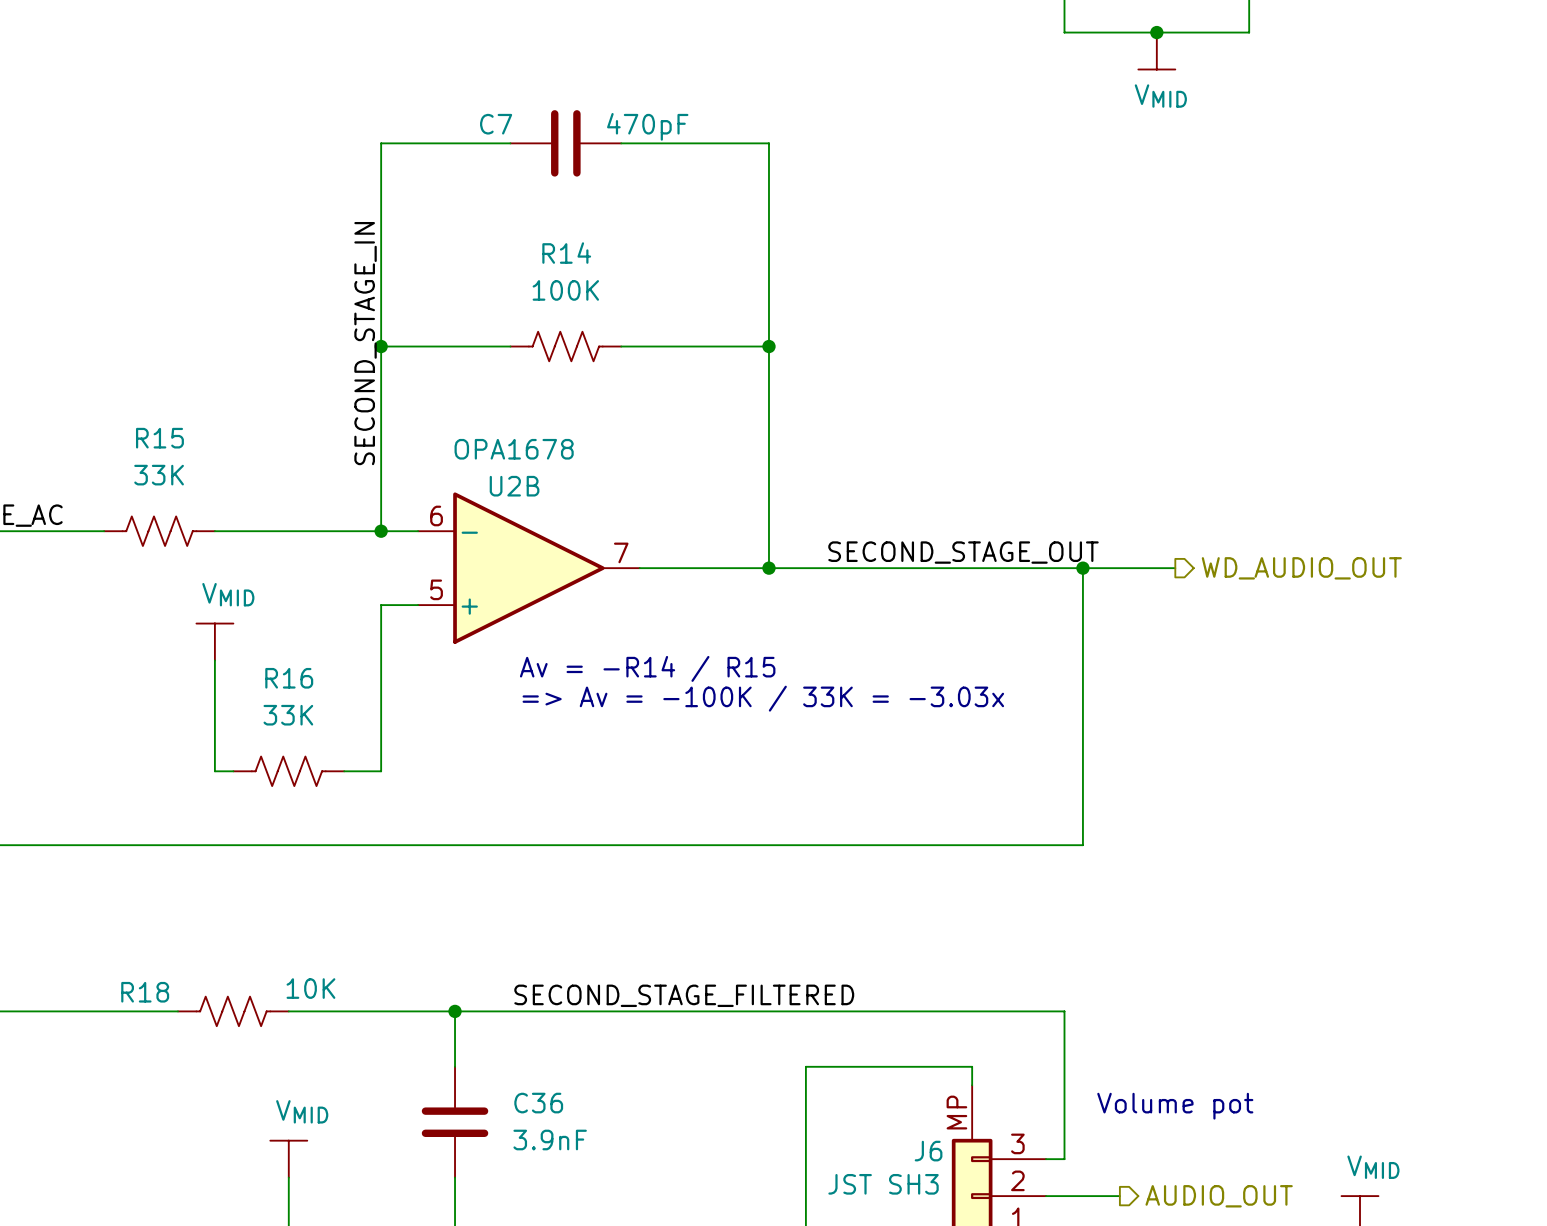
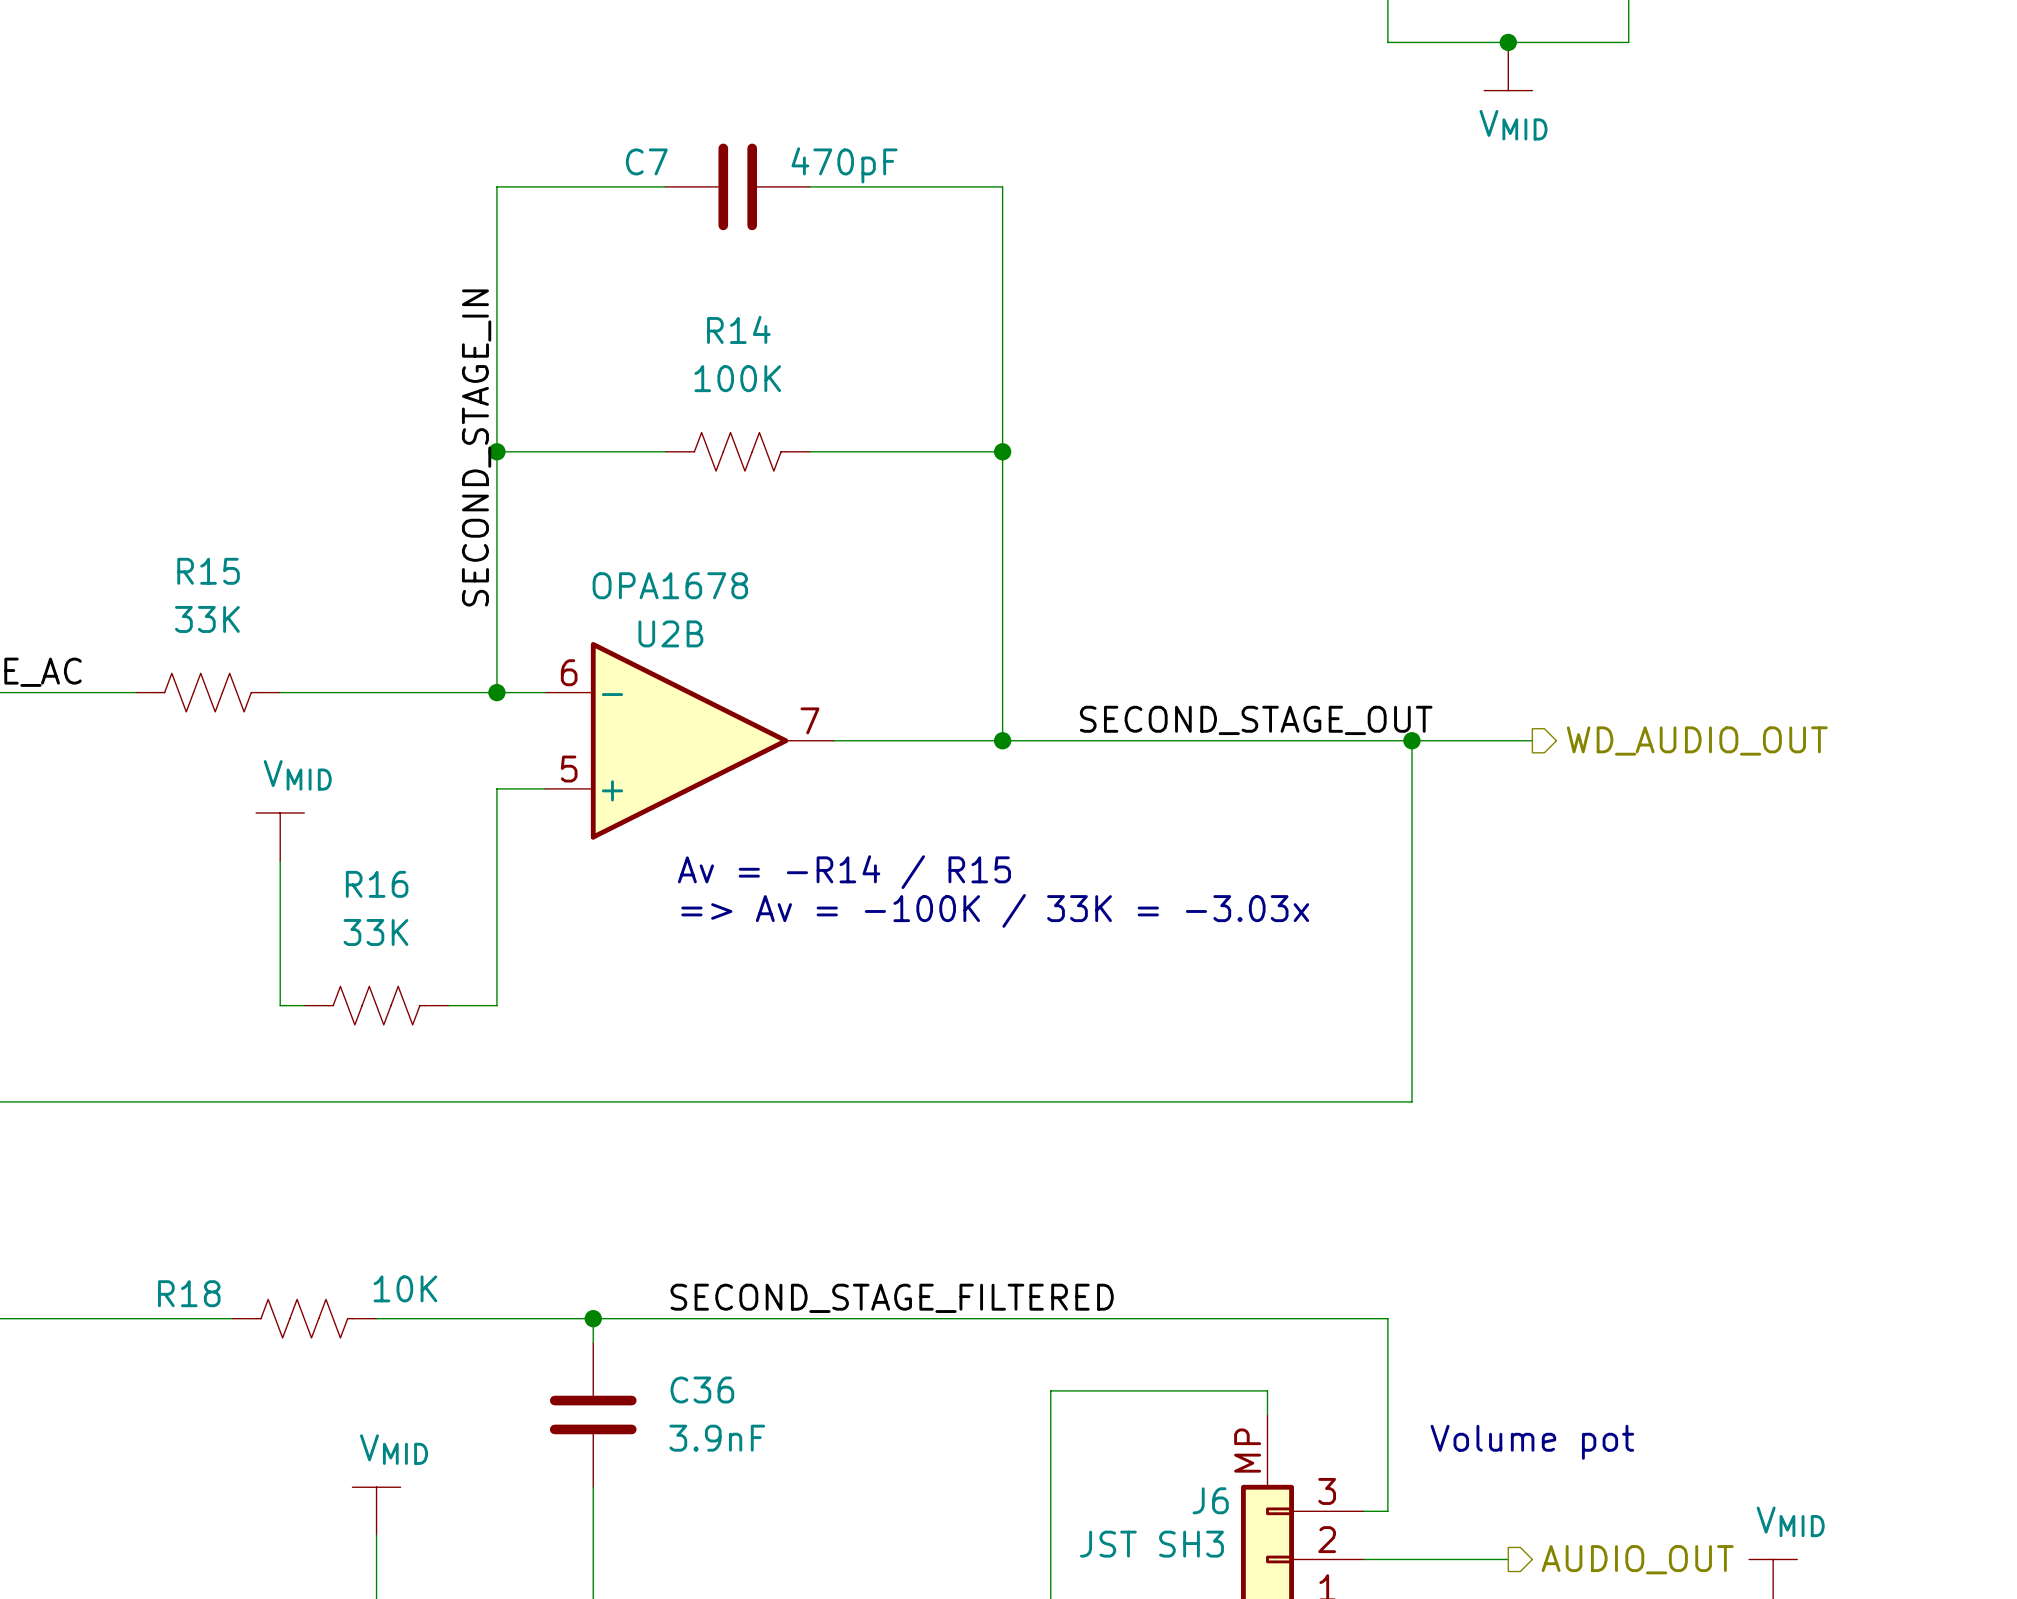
C36 position: (455, 1122) -> (593, 1414)
wire: none -> (1460, 1559) (1508, 1559)
hierarchical label position: AUDIO_OUT (1219, 1196) -> AUDIO_OUT (1637, 1559)

